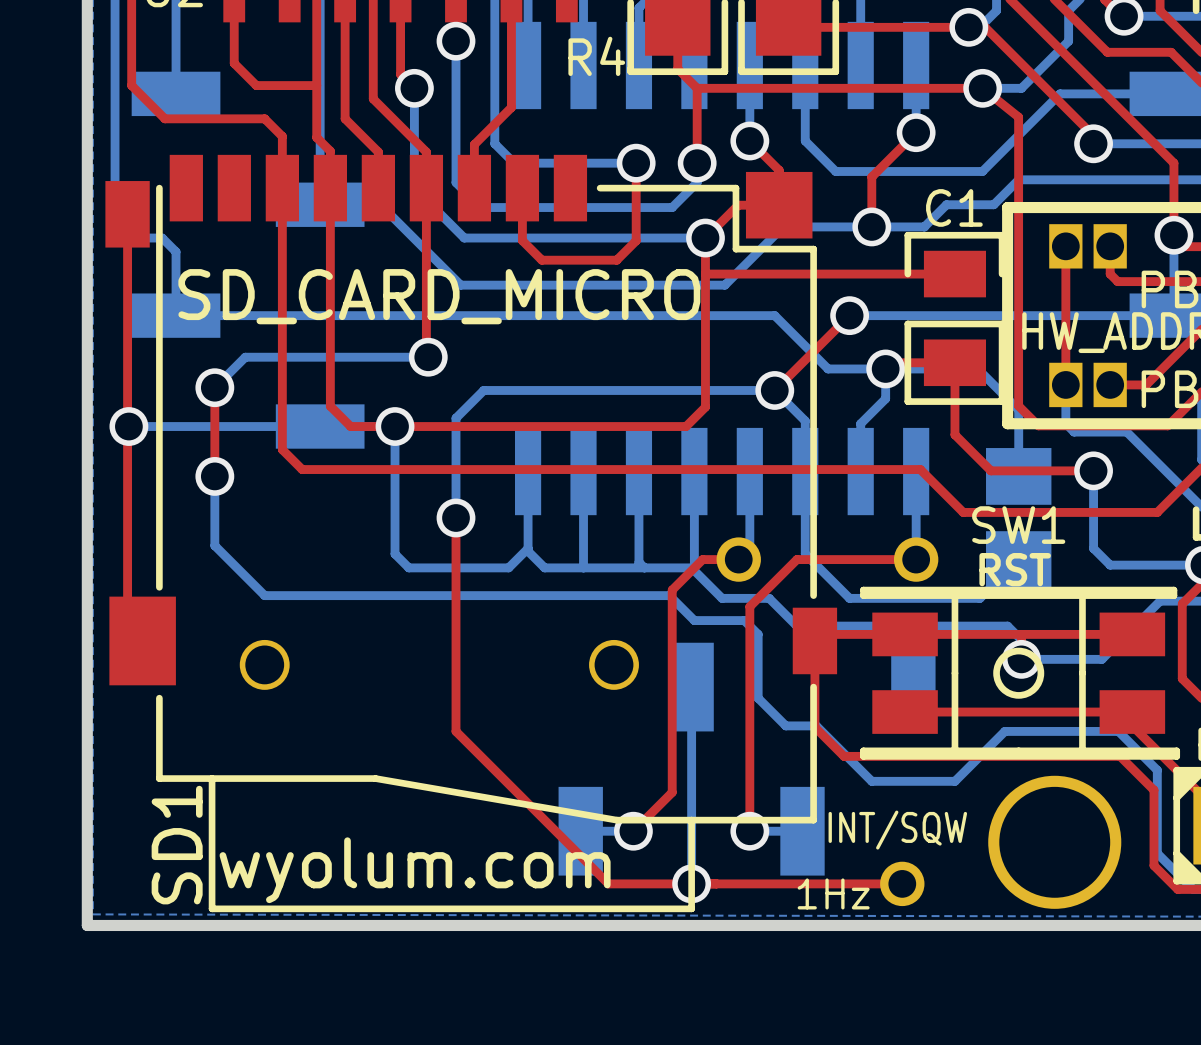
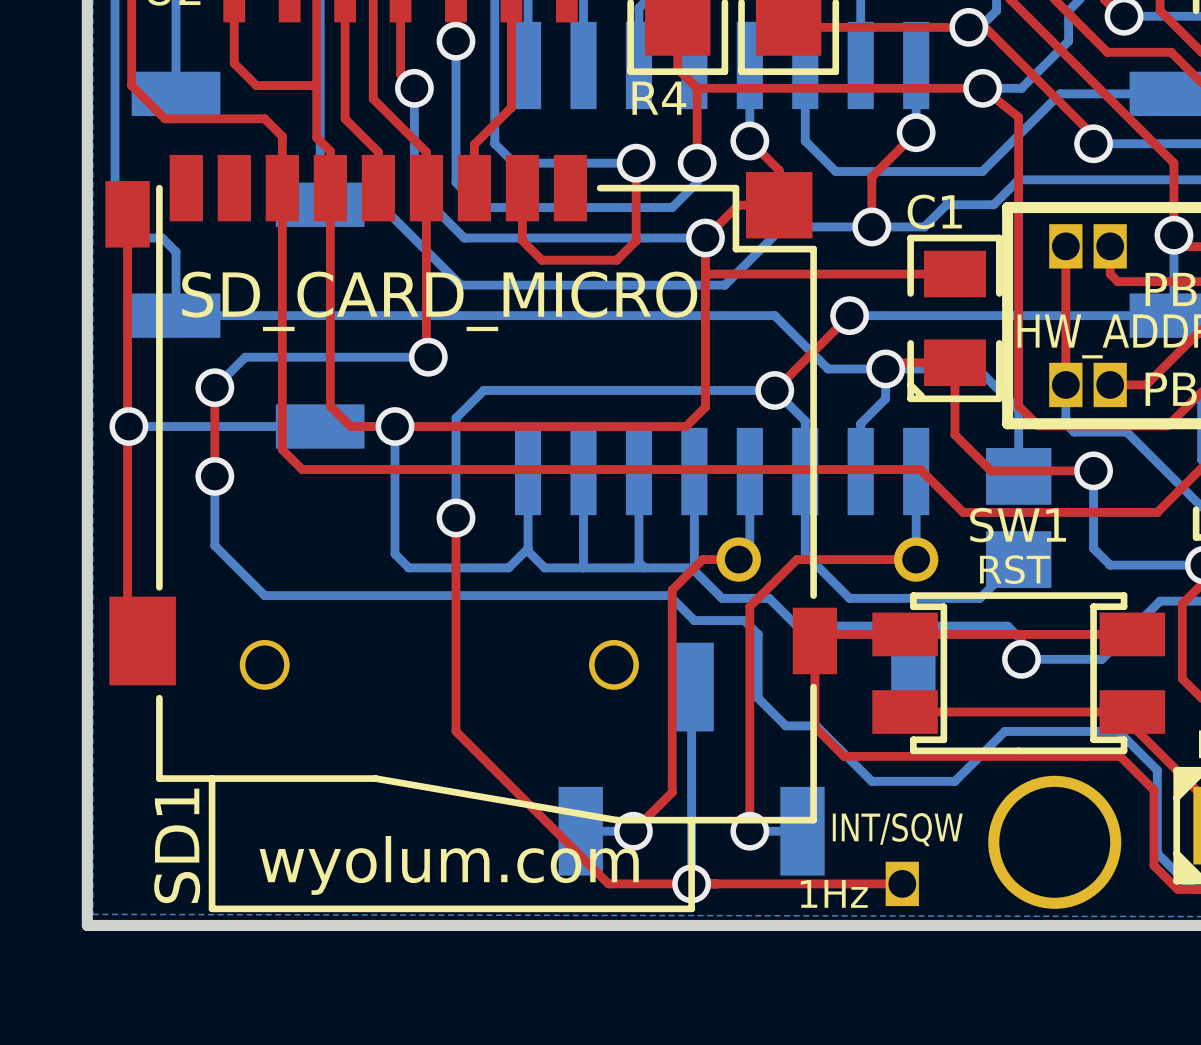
R4 name position: R4 (596, 56) -> R4 (659, 98)
C1 footprint: [904, 231, 1006, 405] -> [907, 234, 1003, 403]
SW1 footprint: [860, 586, 1181, 760] -> [872, 592, 1166, 755]
part footprint: [880, 861, 925, 907] -> [885, 861, 919, 907]
text position: wyolum.com (415, 870) -> wyolum.com (449, 865)

